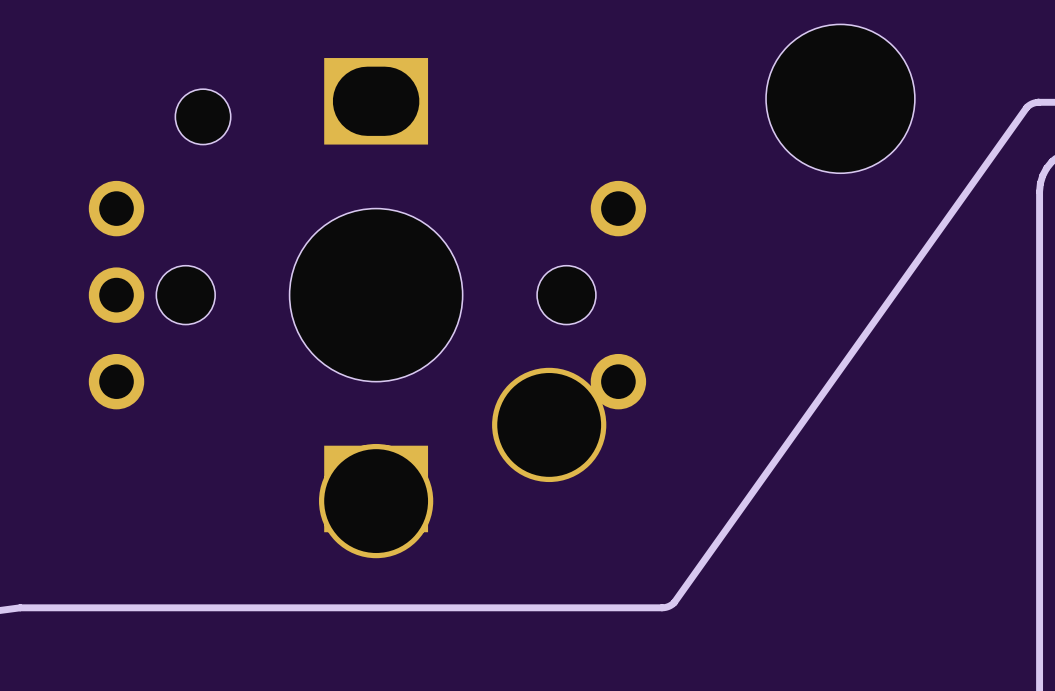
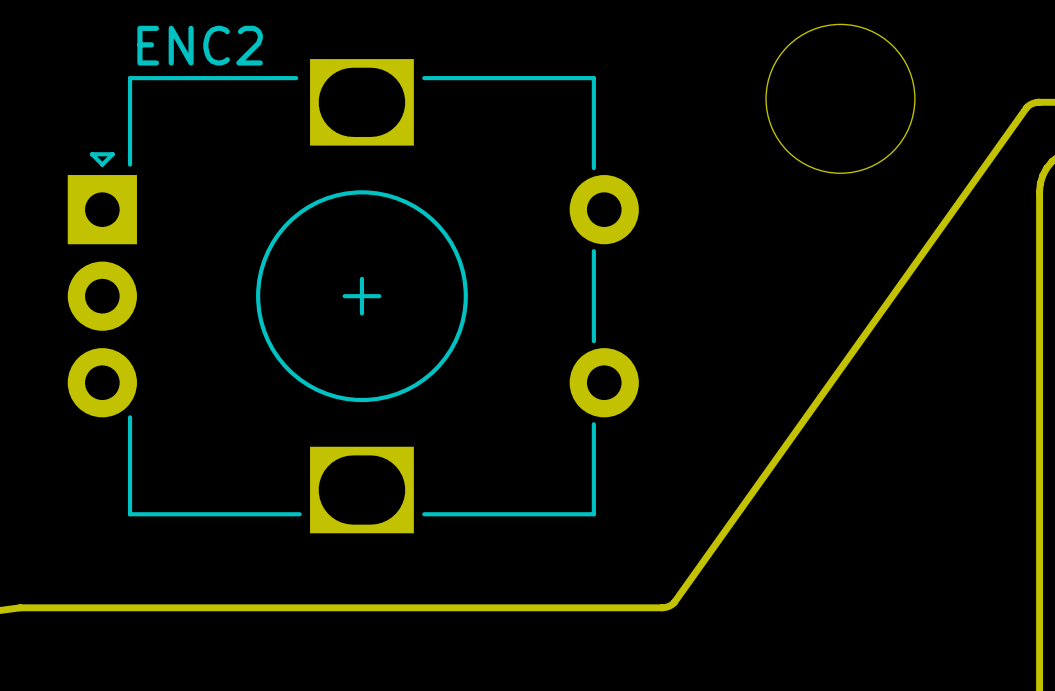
ENC2: none -> (353, 296)
part: (367, 308) -> none

